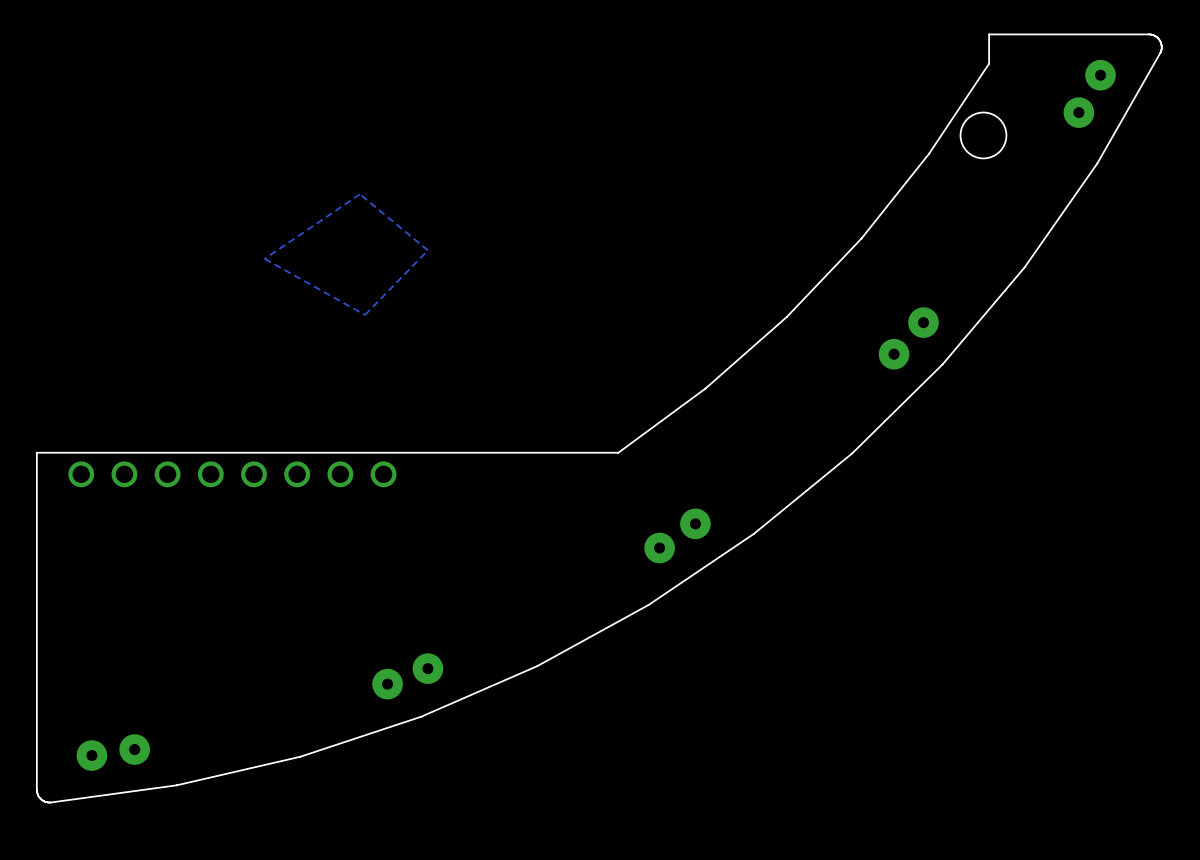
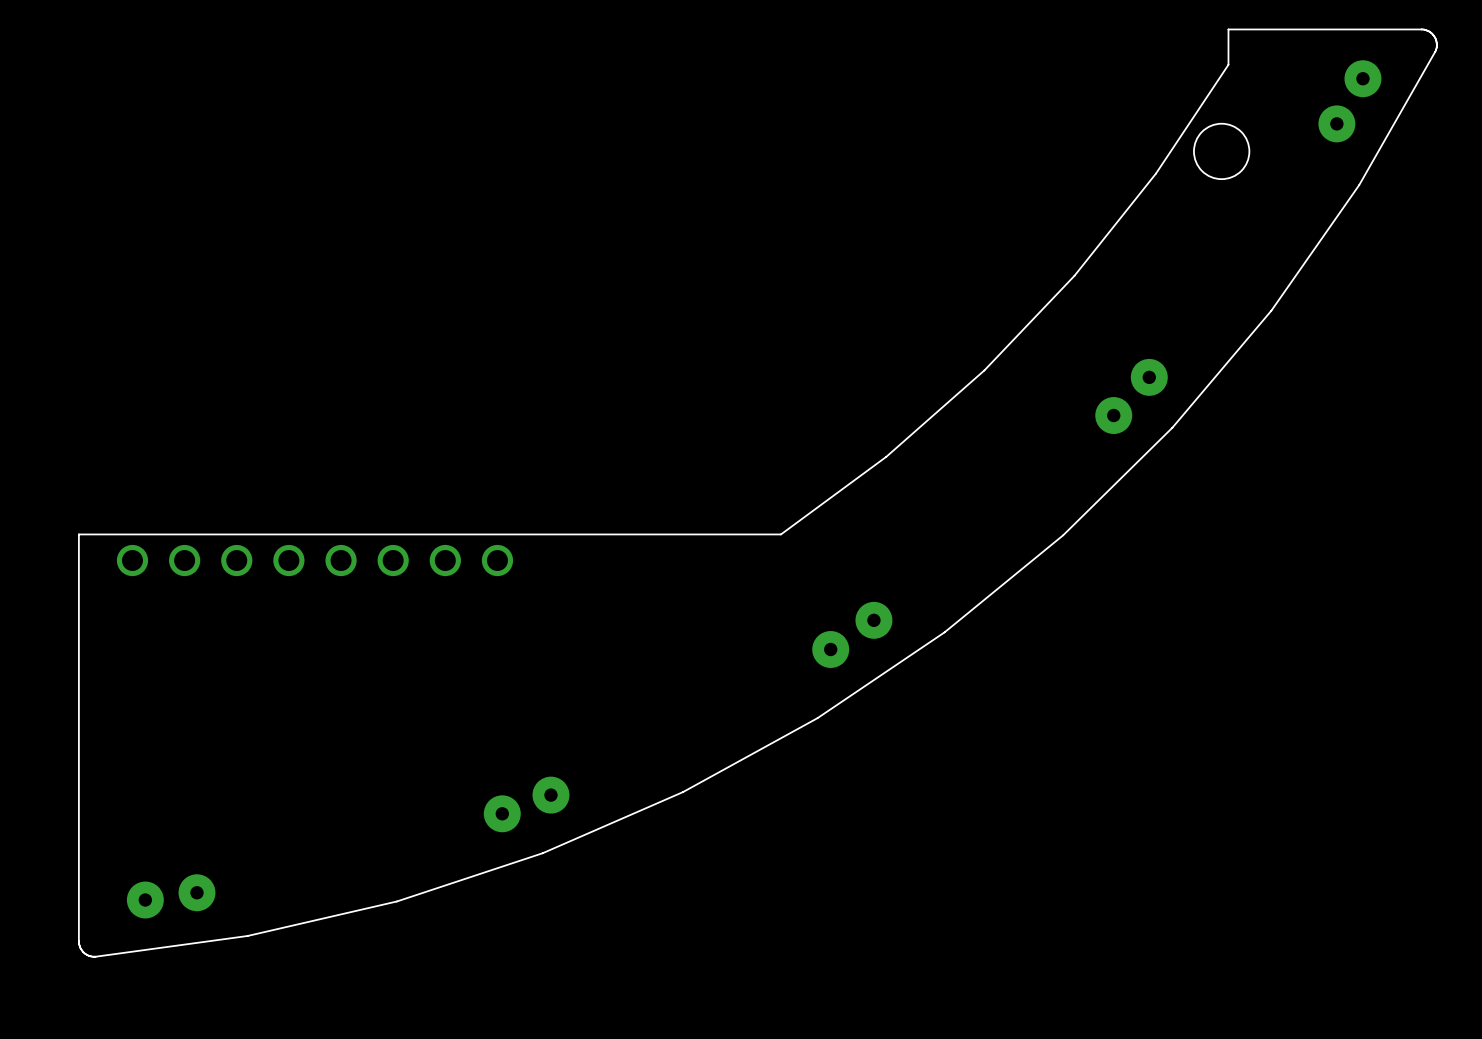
zone outline: (359, 194) (427, 250) (365, 314) (264, 258) (359, 194) -> none

